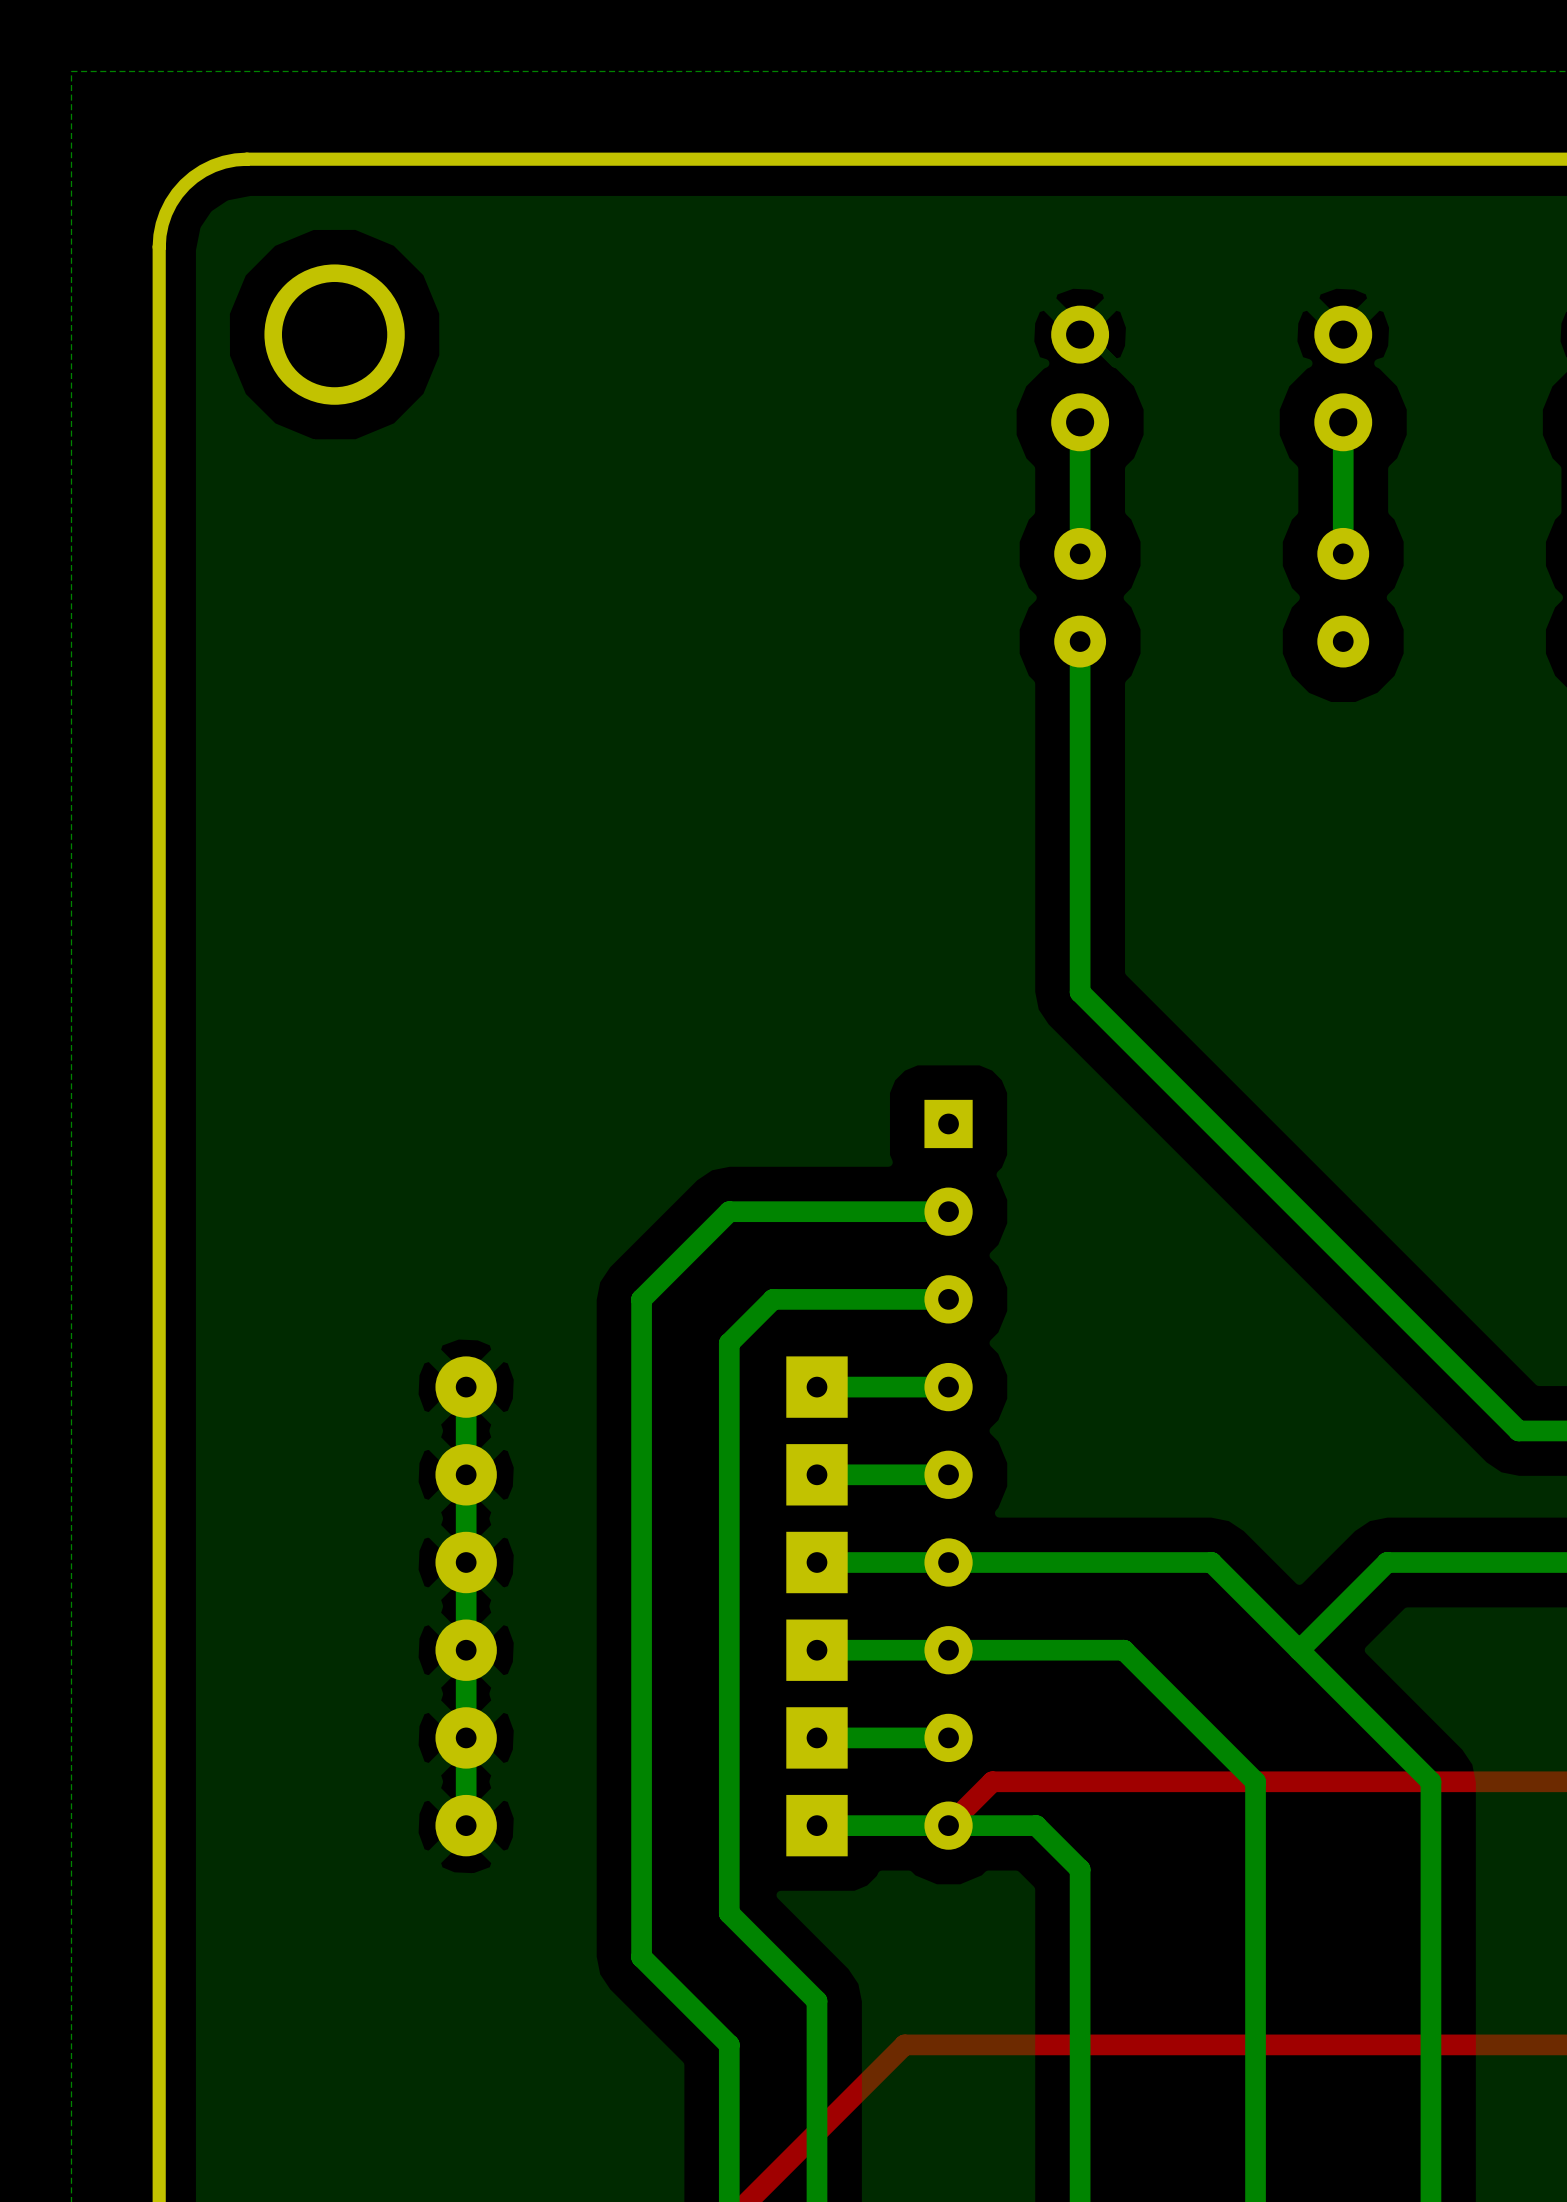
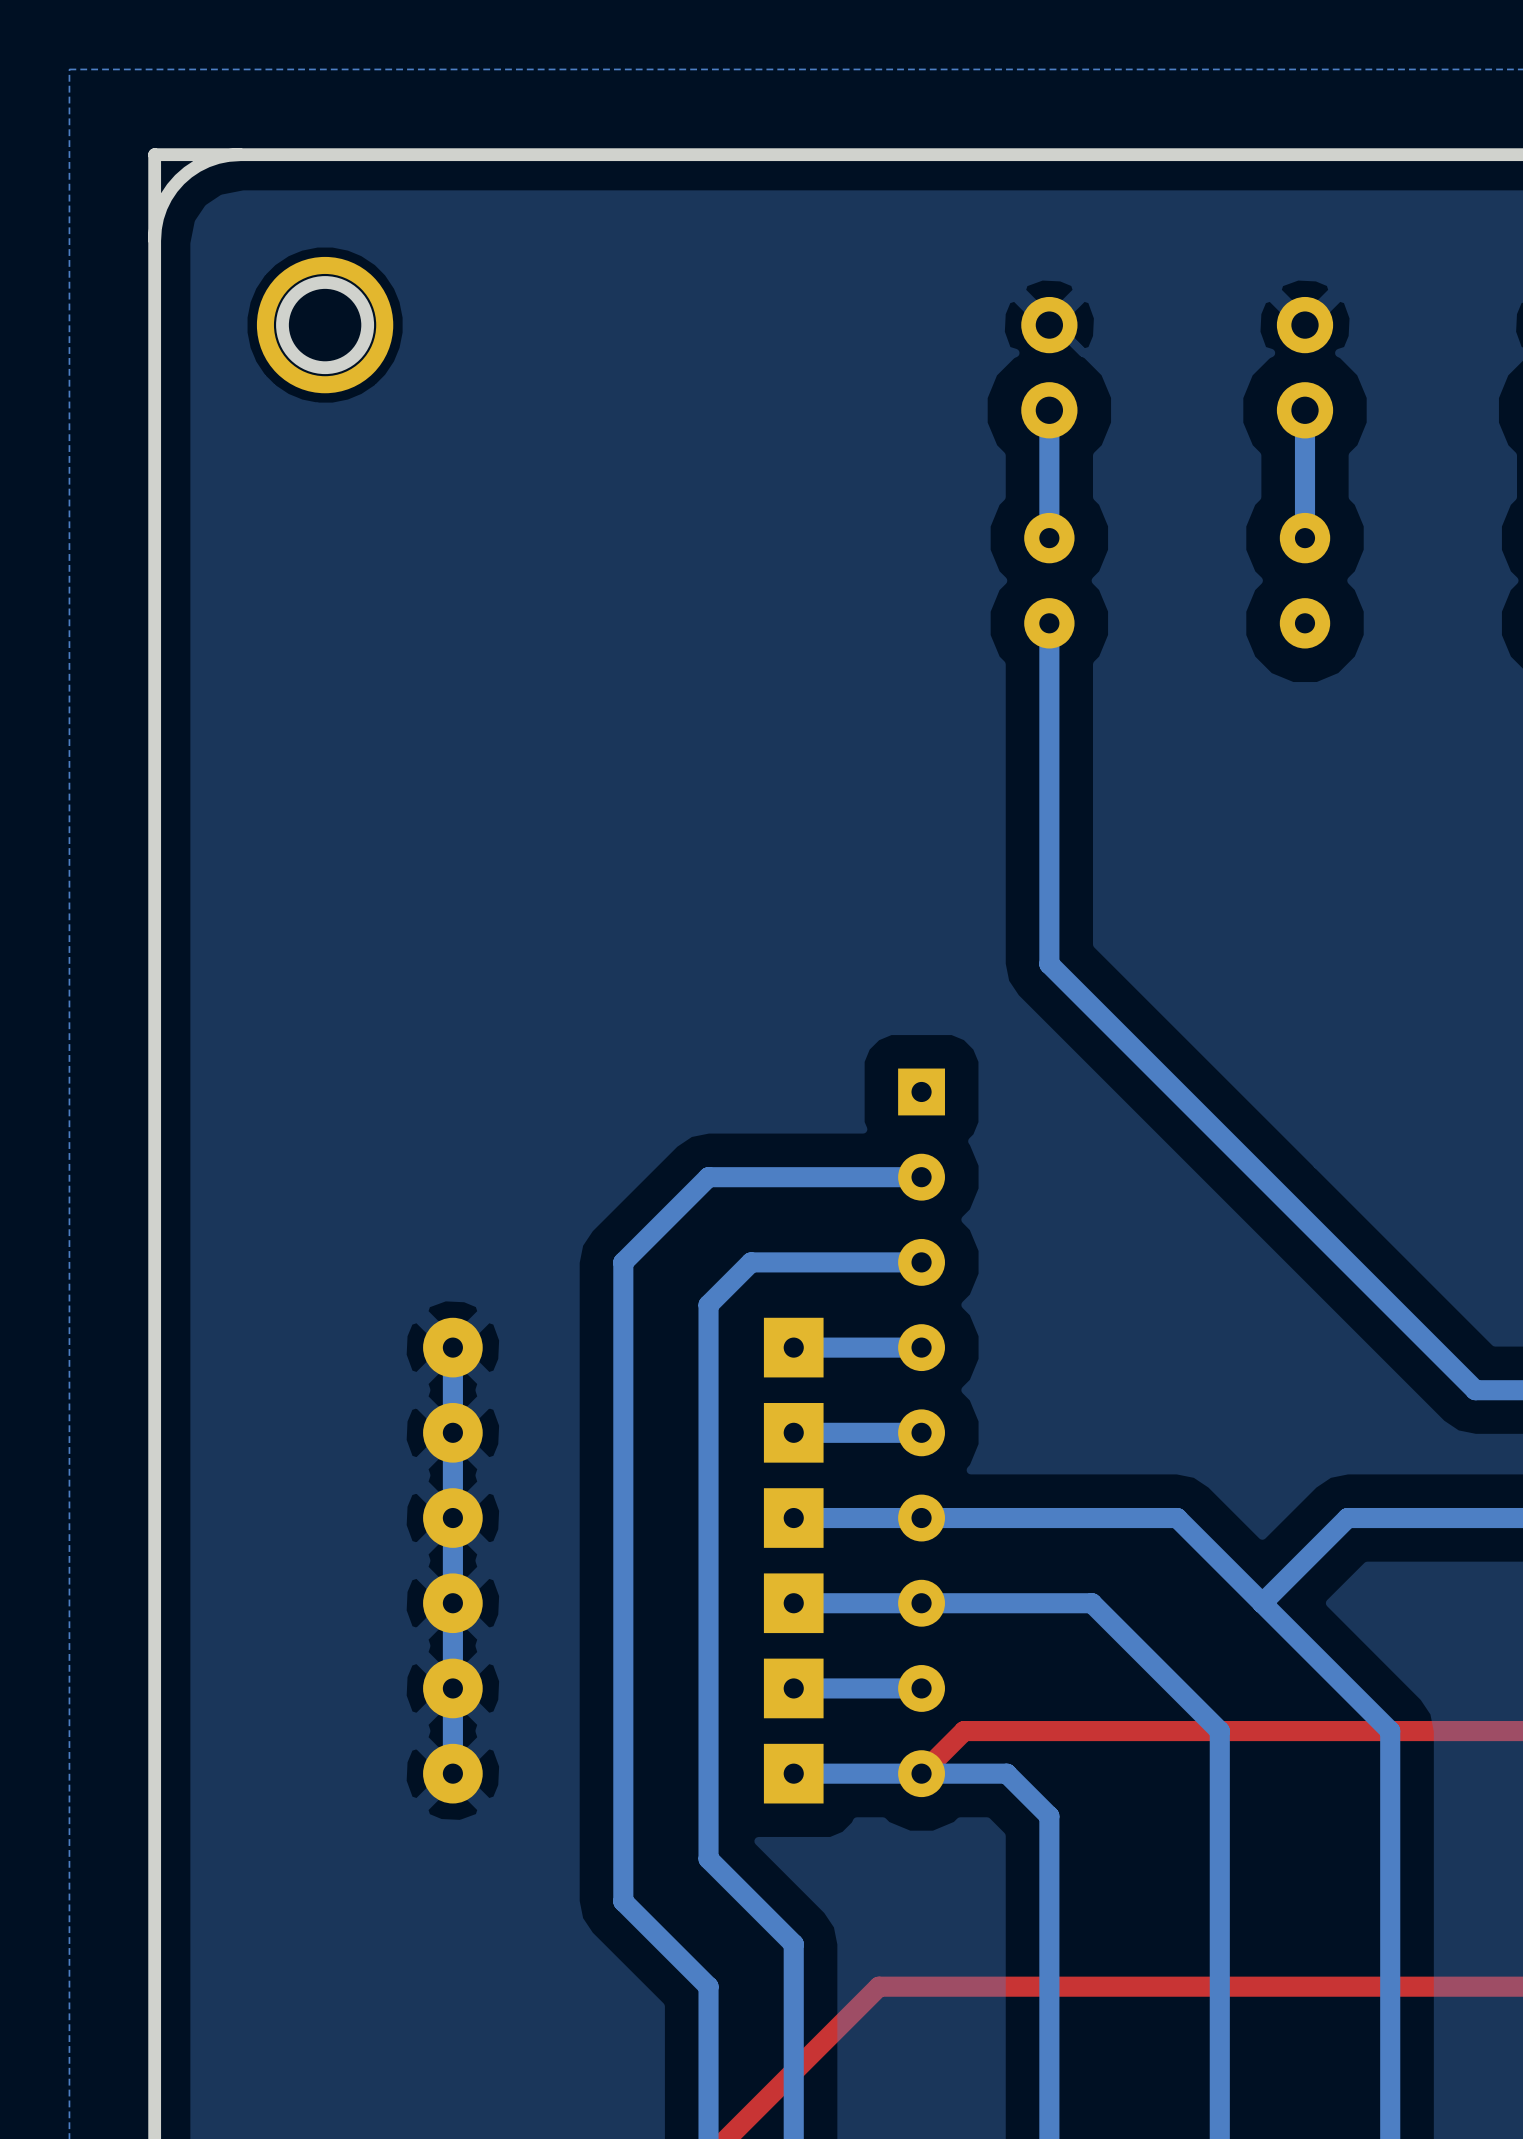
board edge: none -> (239, 154) (154, 154) (154, 239)
round board edge: none -> [276, 276, 375, 375]

